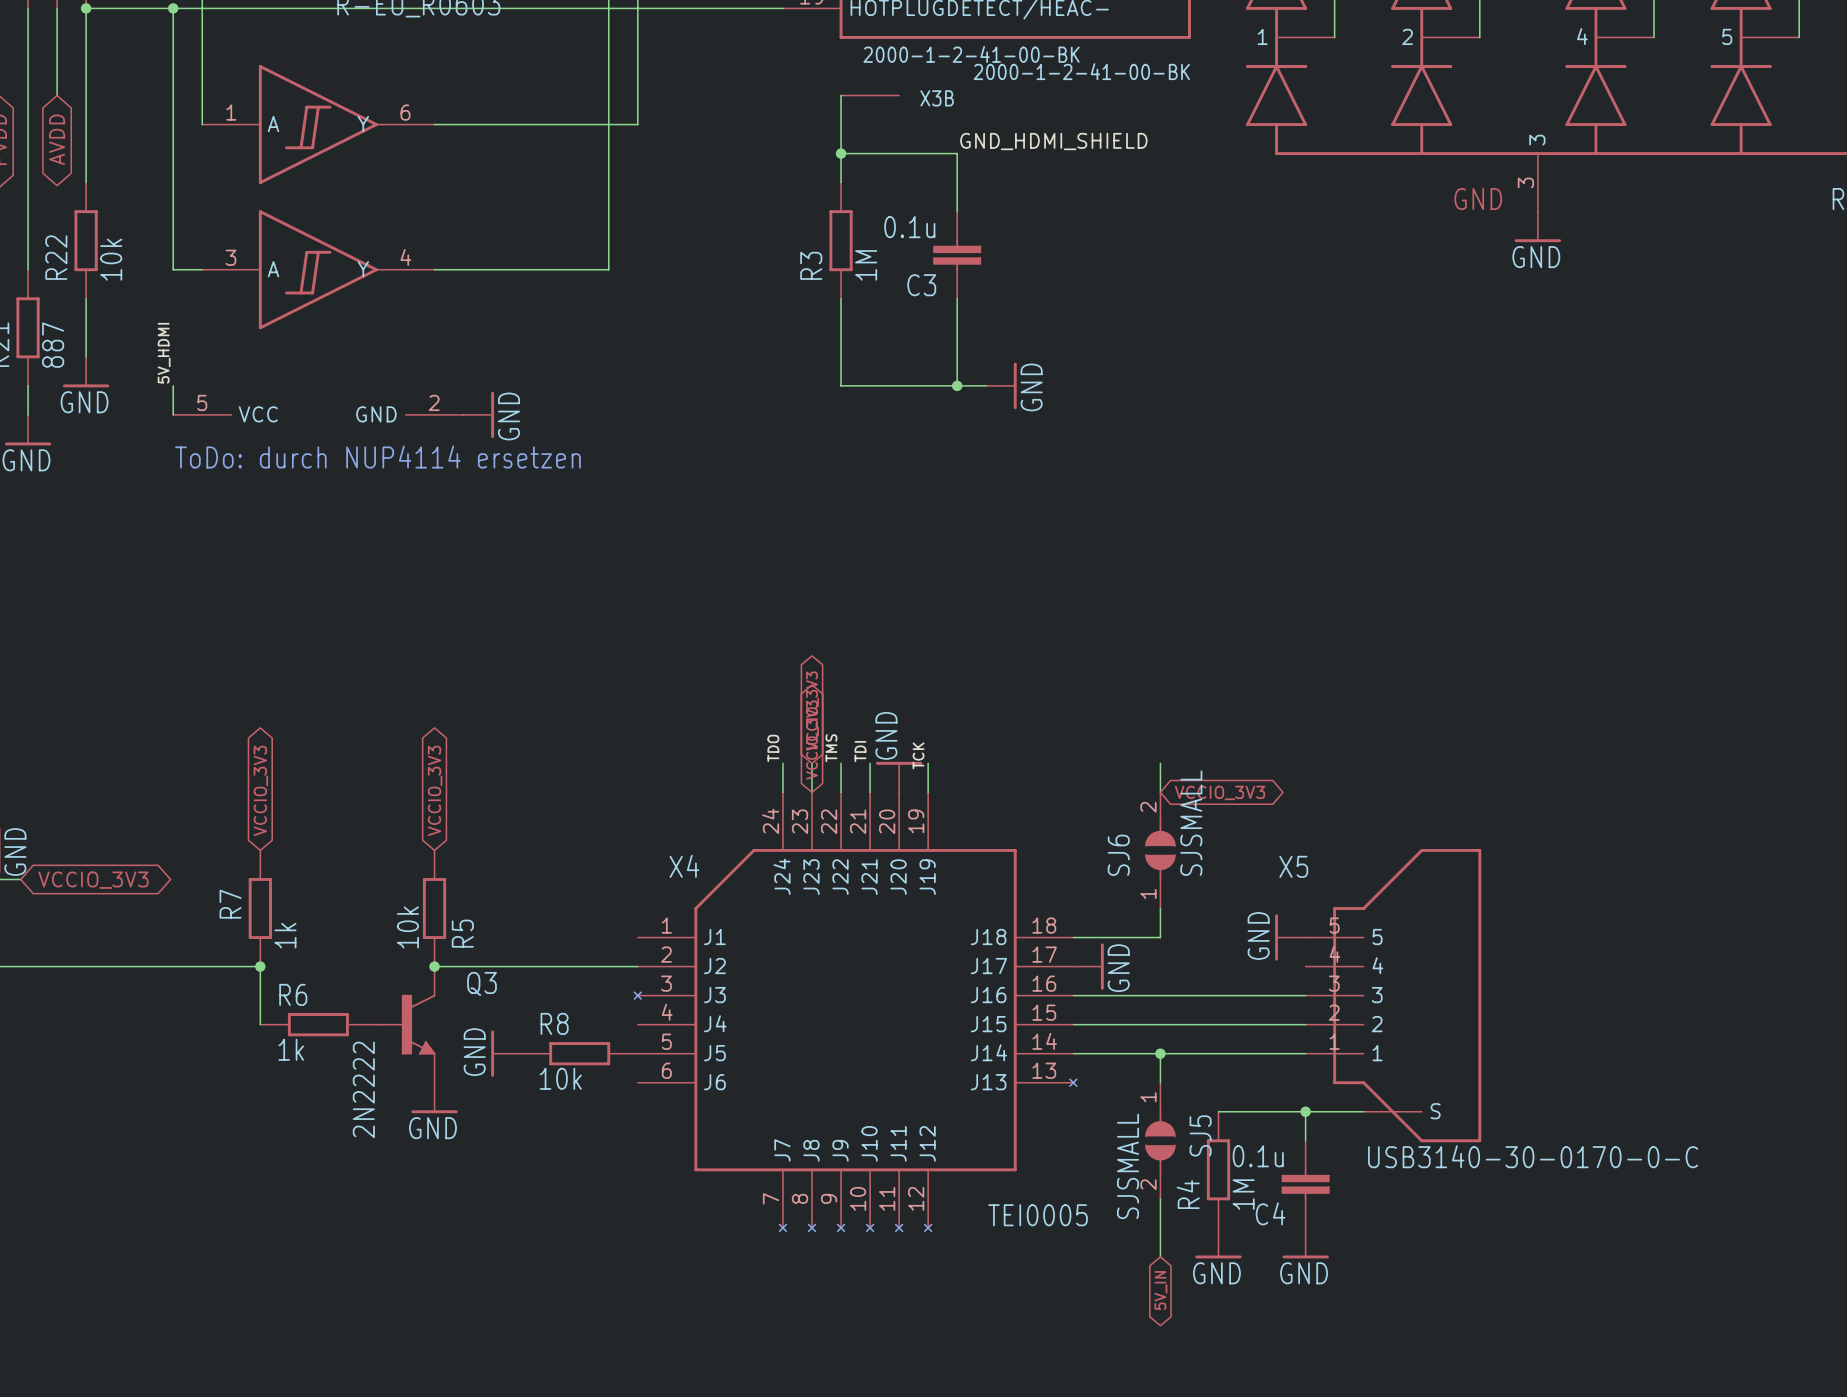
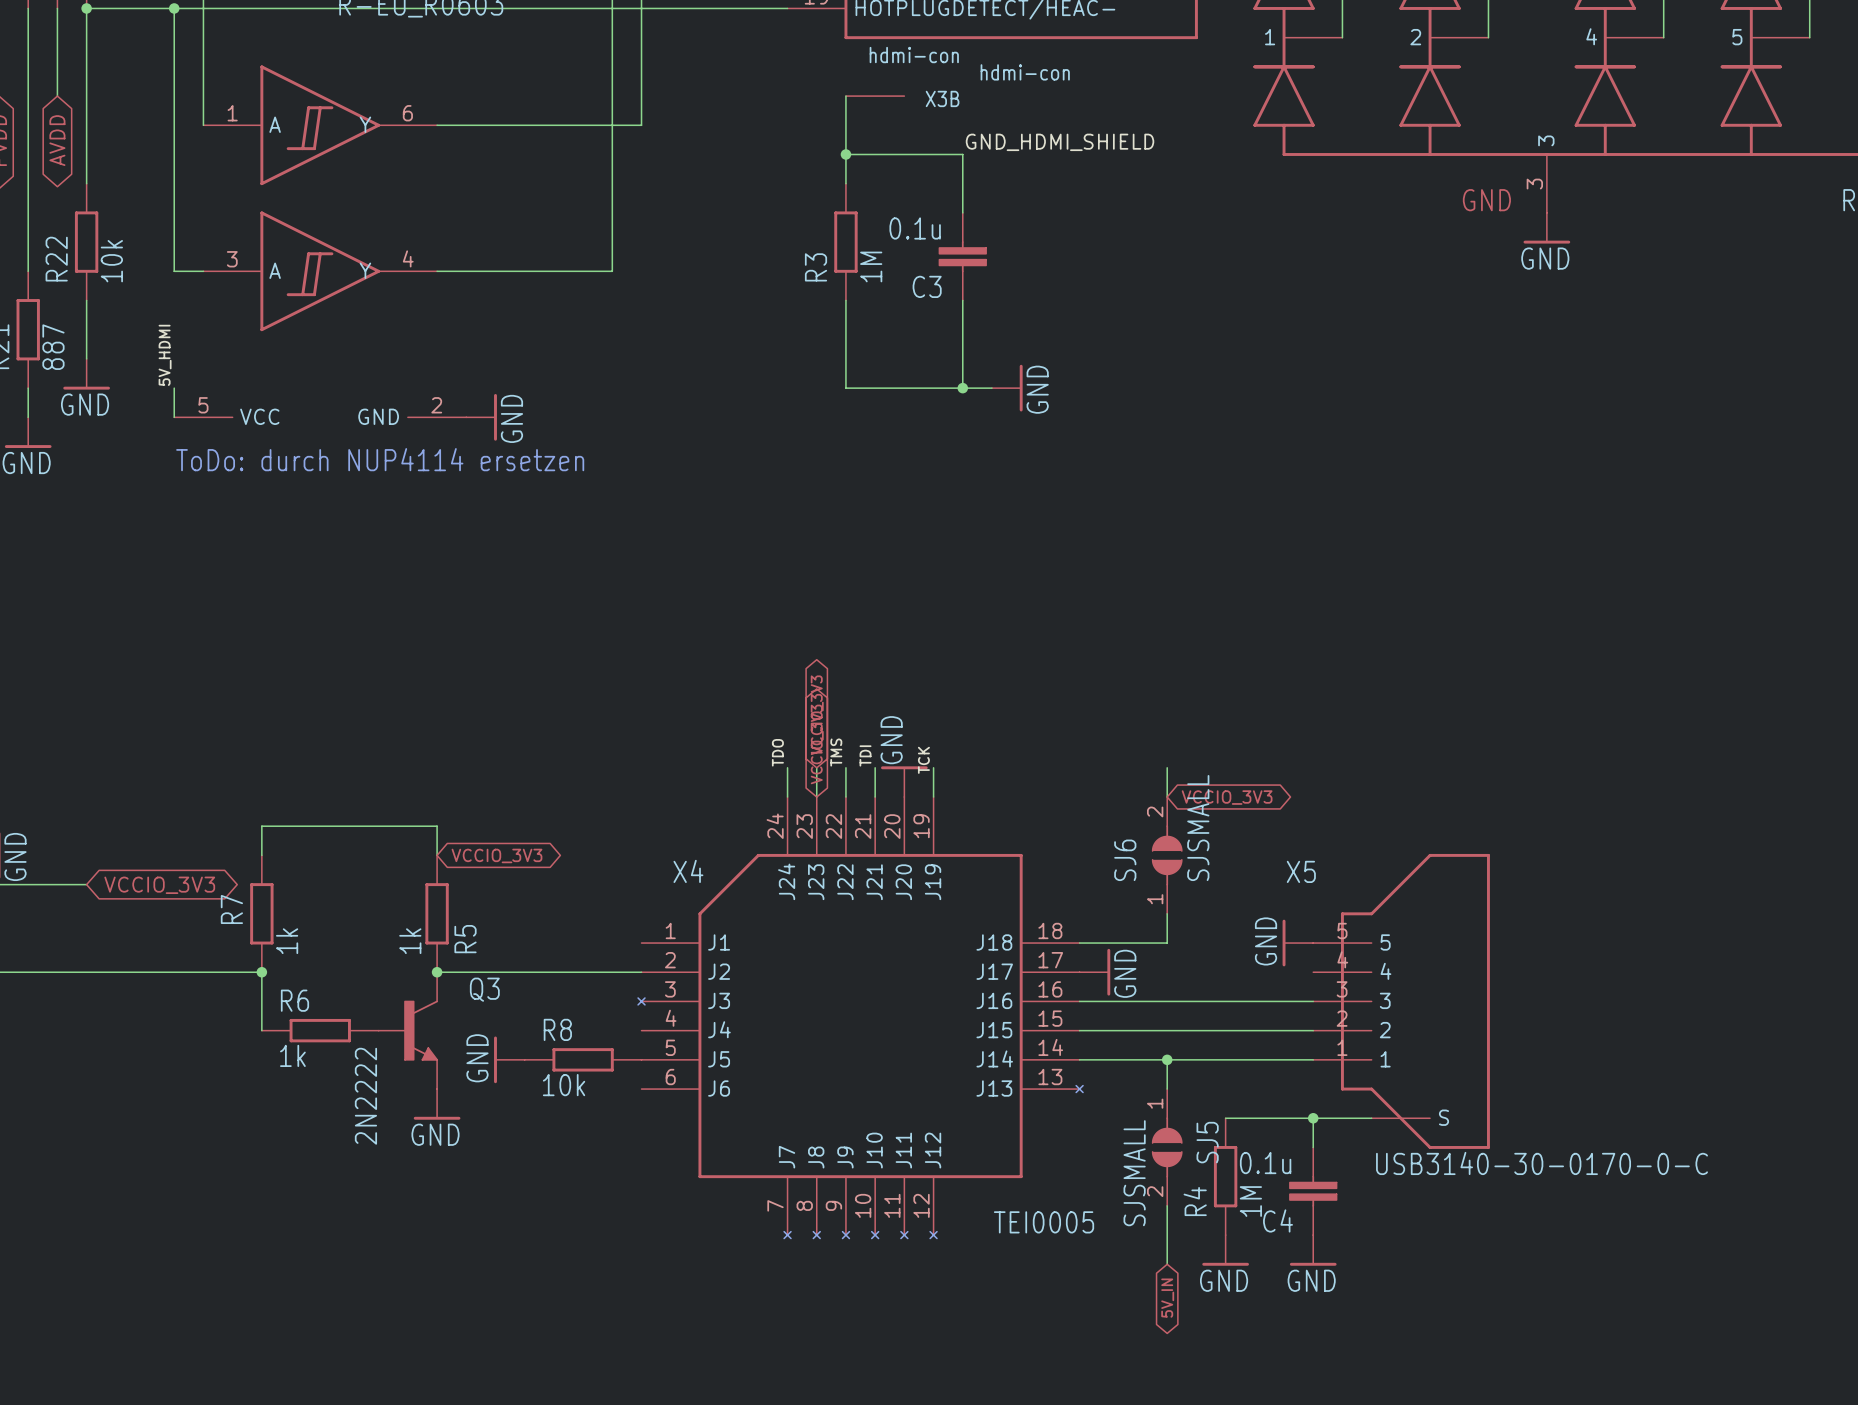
X3B value: 2000-1-2-41-00-BK (971, 54) -> hdmi-con (914, 55)
part value: 2000-1-2-41-00-BK (1081, 71) -> hdmi-con (1025, 72)
global label: VCCIO_3V3 (260, 790) -> none
global label rotation: 0° (435, 790) -> 90° clockwise (496, 855)
wire: none -> (261, 855) (261, 826) (437, 826) (437, 855)
wire: none -> (20, 884) (86, 884)
global label position: VCCIO_3V3 (93, 880) -> VCCIO_3V3 (159, 885)
R5 value: 10k (407, 927) -> 1k (410, 941)

